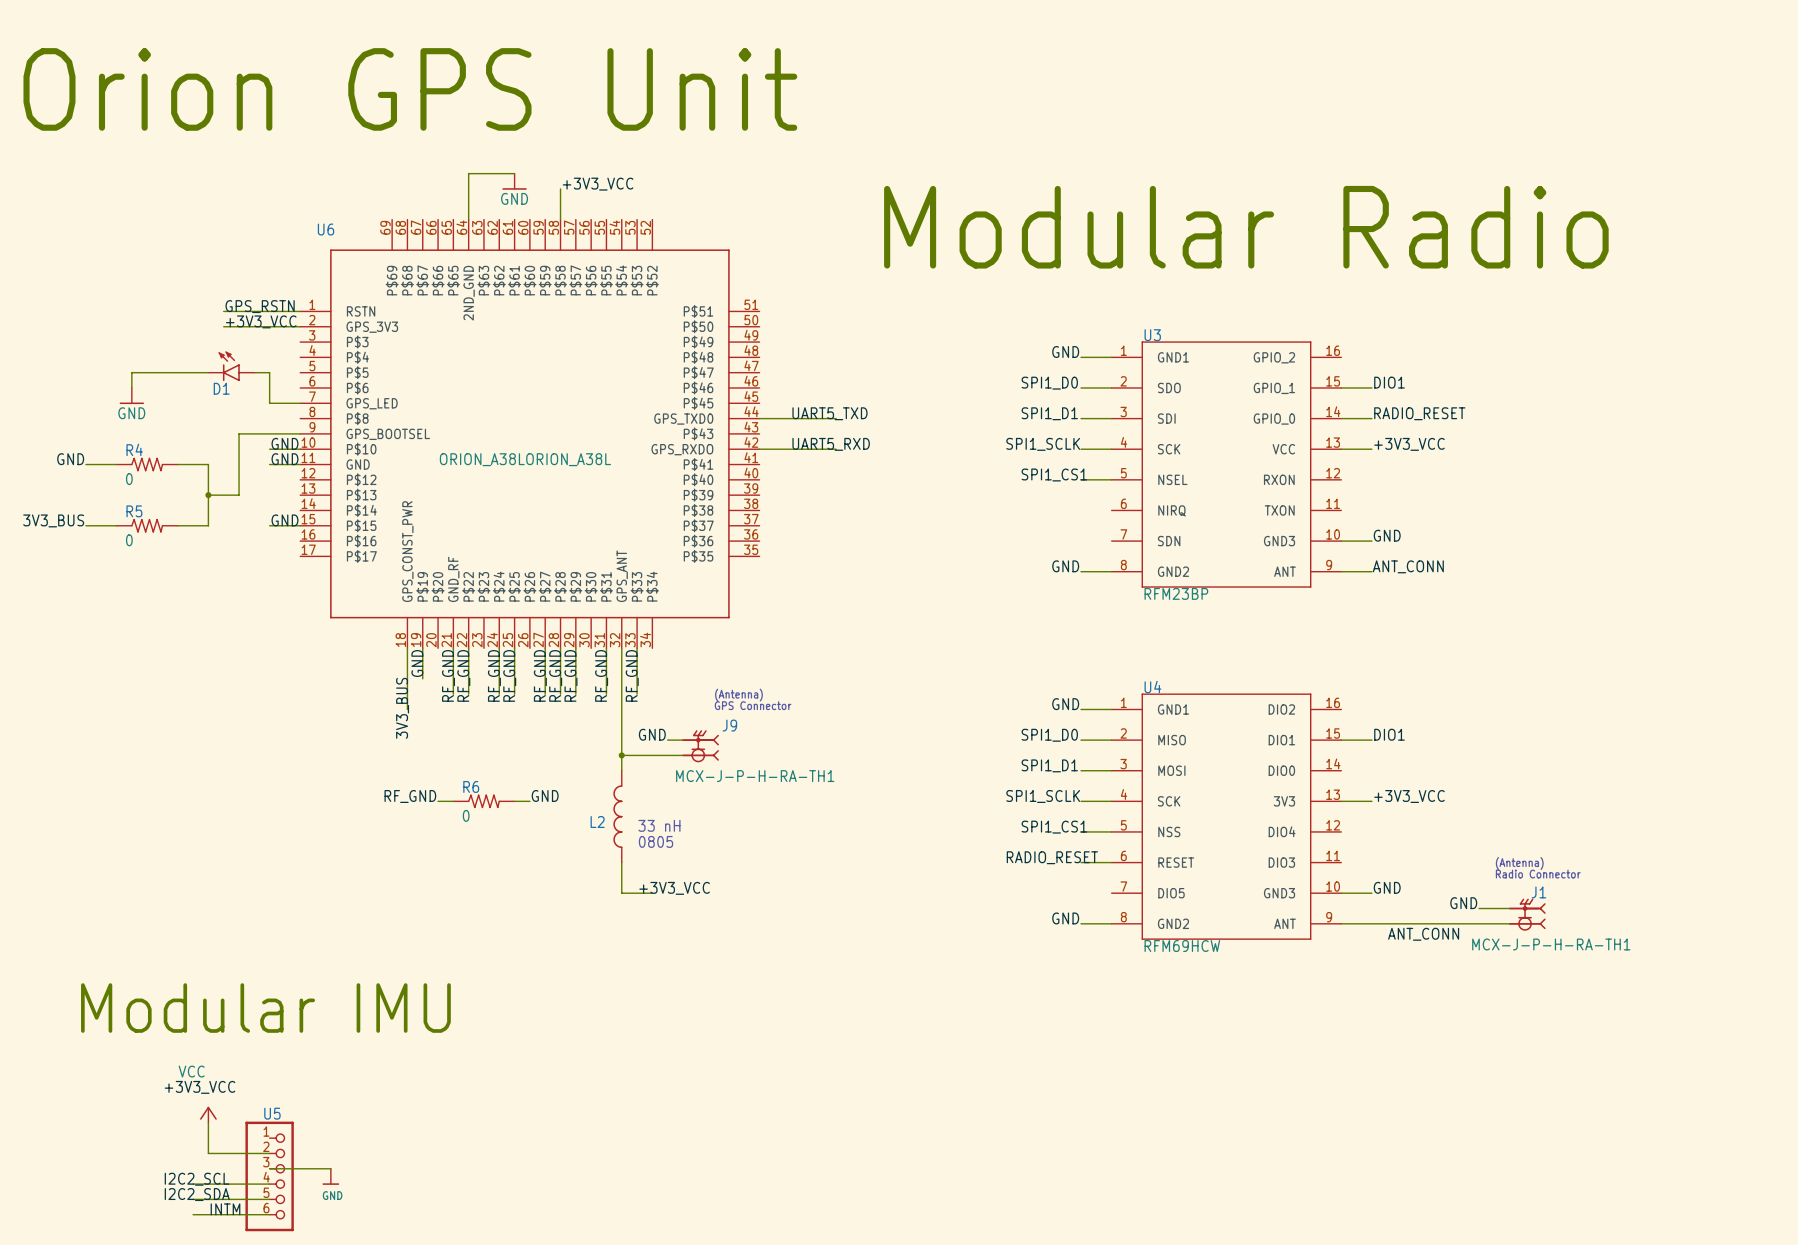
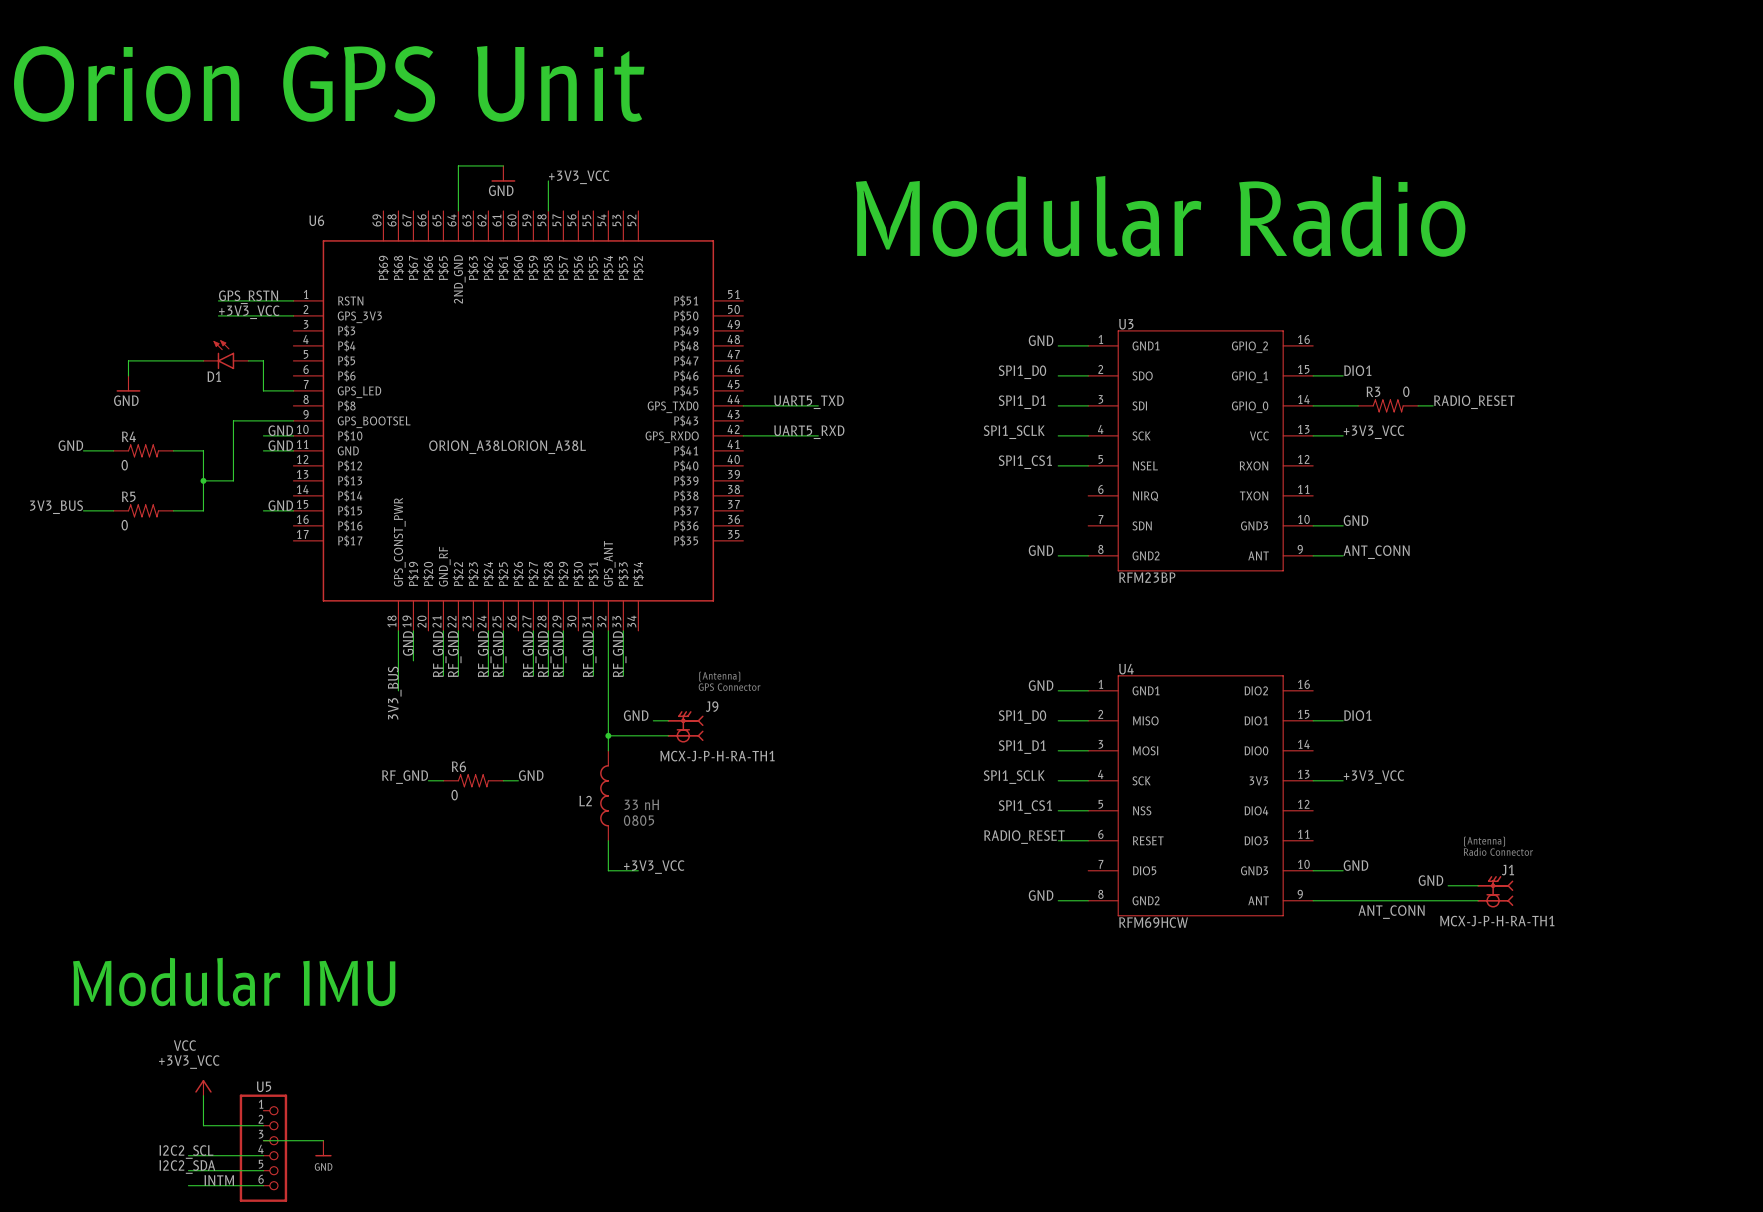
label position: RADIO_RESET (1419, 413) -> RADIO_RESET (1474, 402)
wire: none -> (1343, 405) (1358, 405)
R3: none -> 0 (1388, 405)
wire: none -> (1418, 405) (1433, 405)

